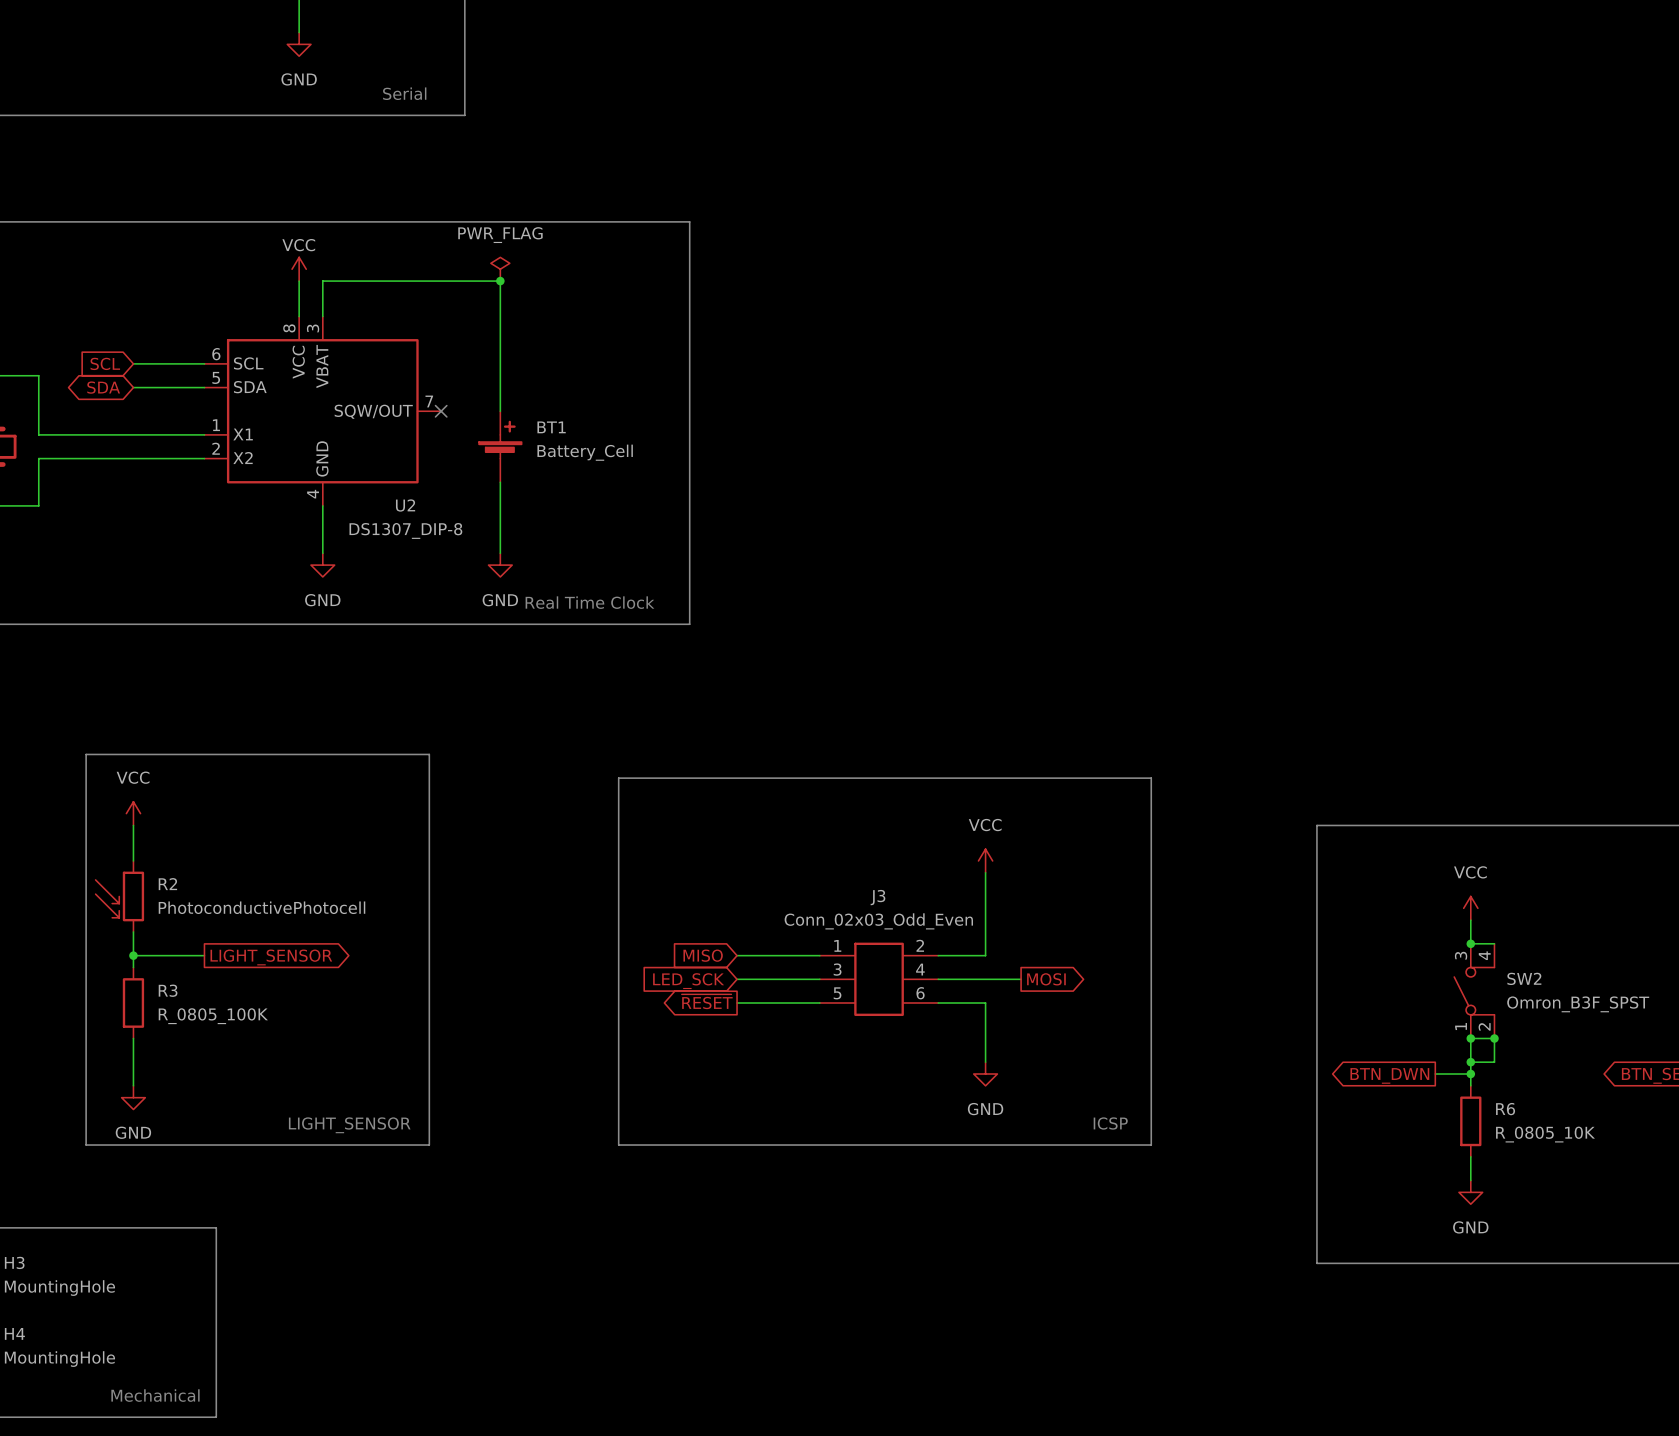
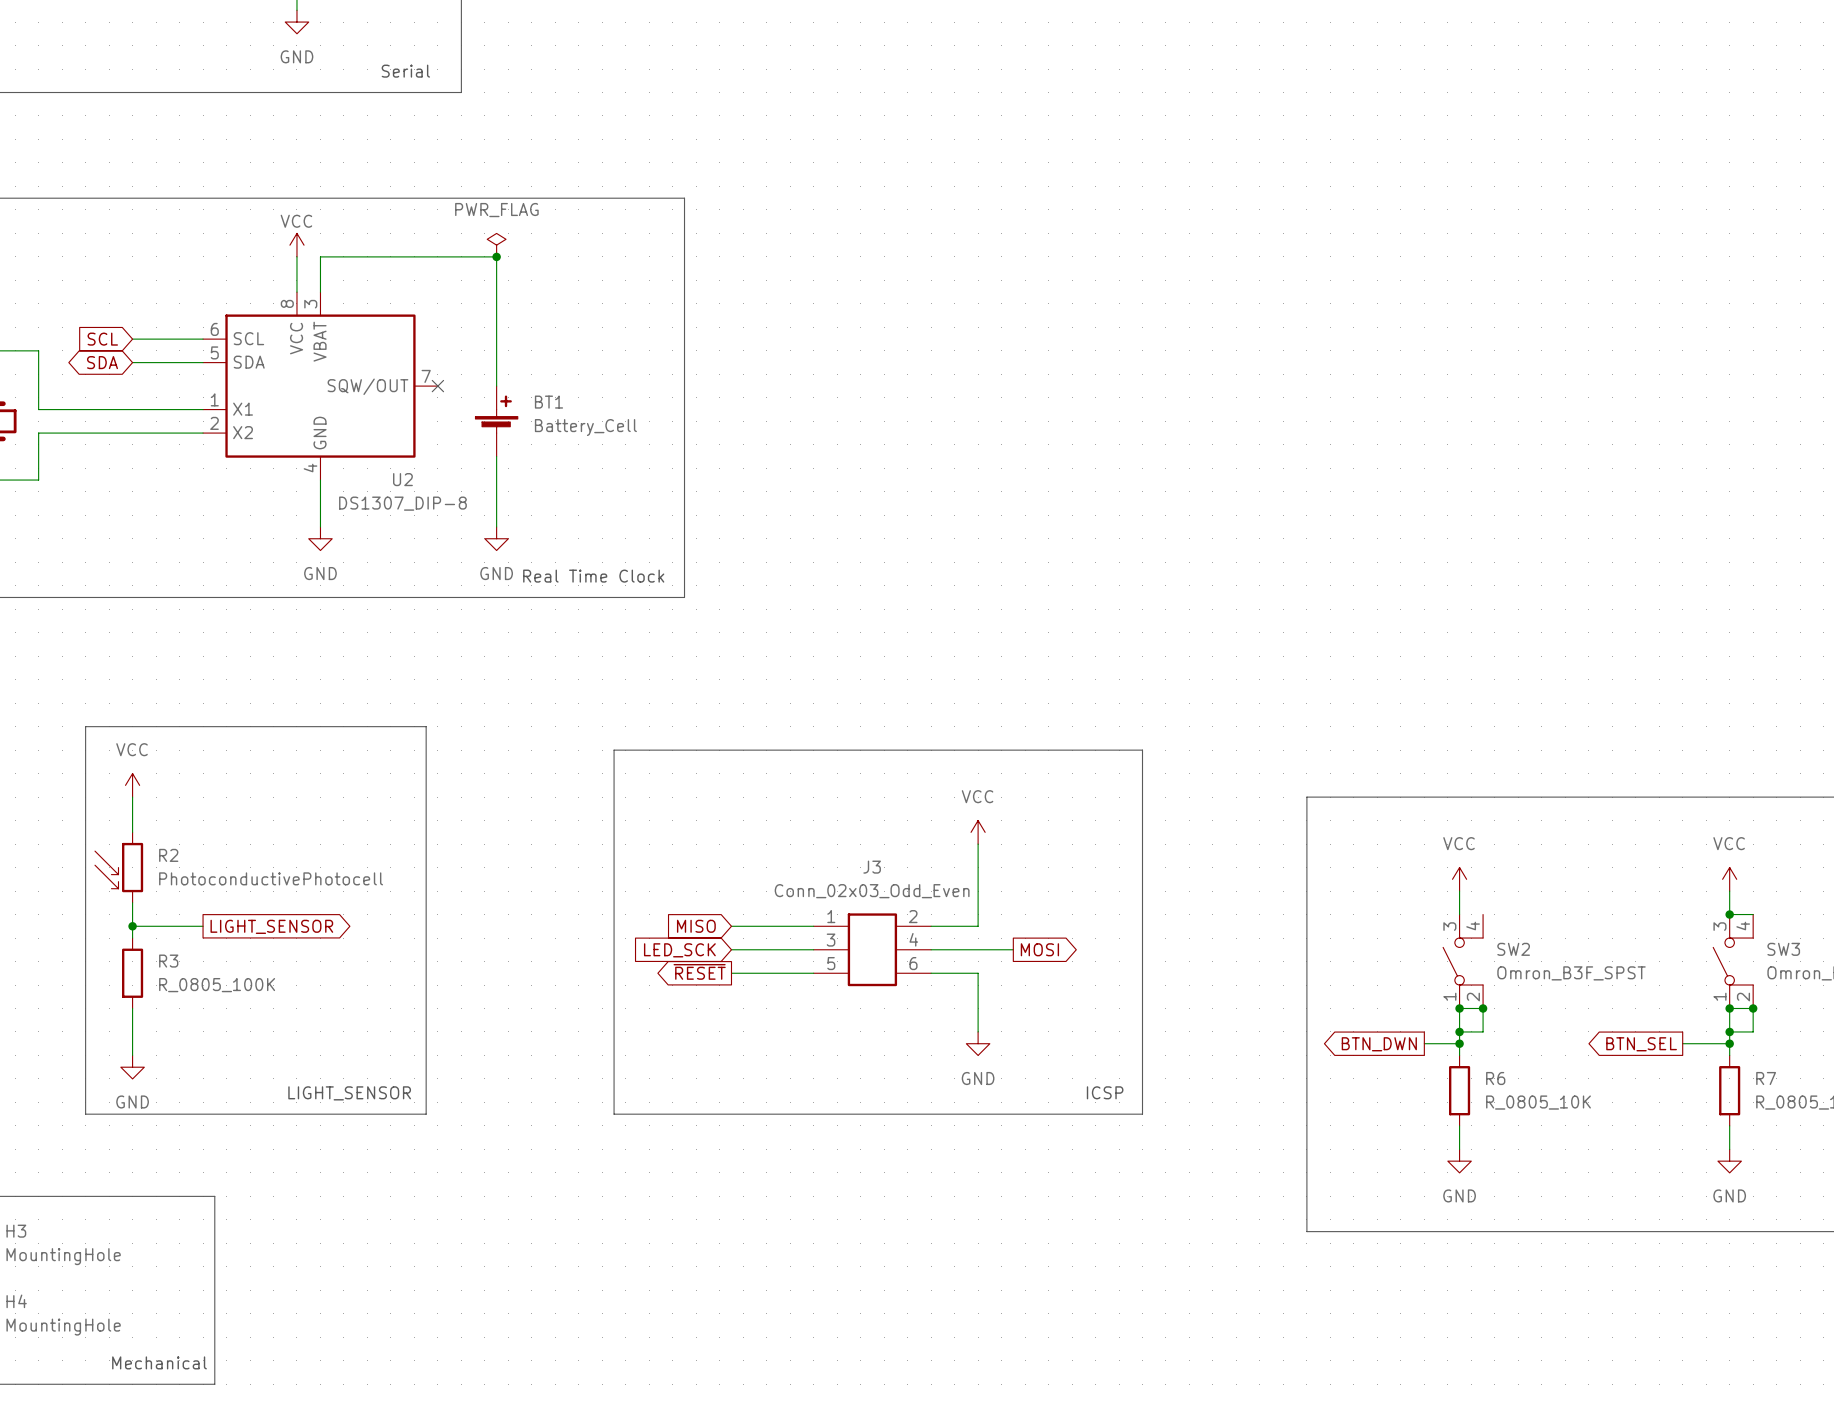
wire: (1470, 943) (1494, 943) -> none
junction: (1470, 943) -> none

